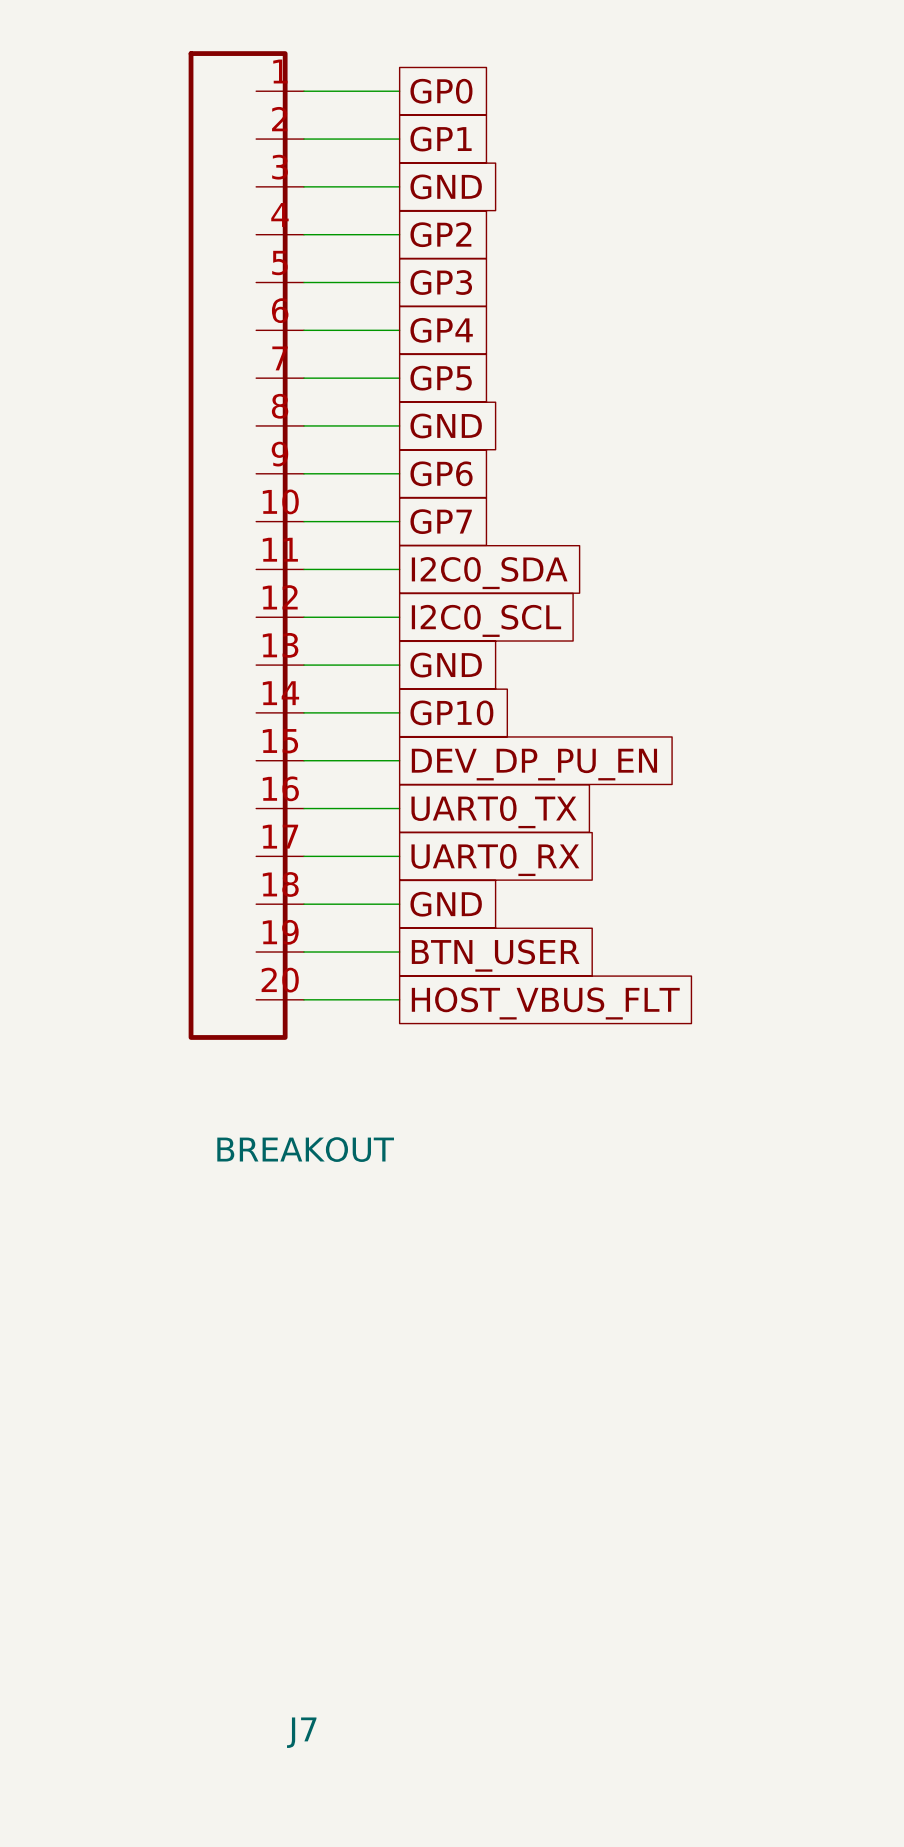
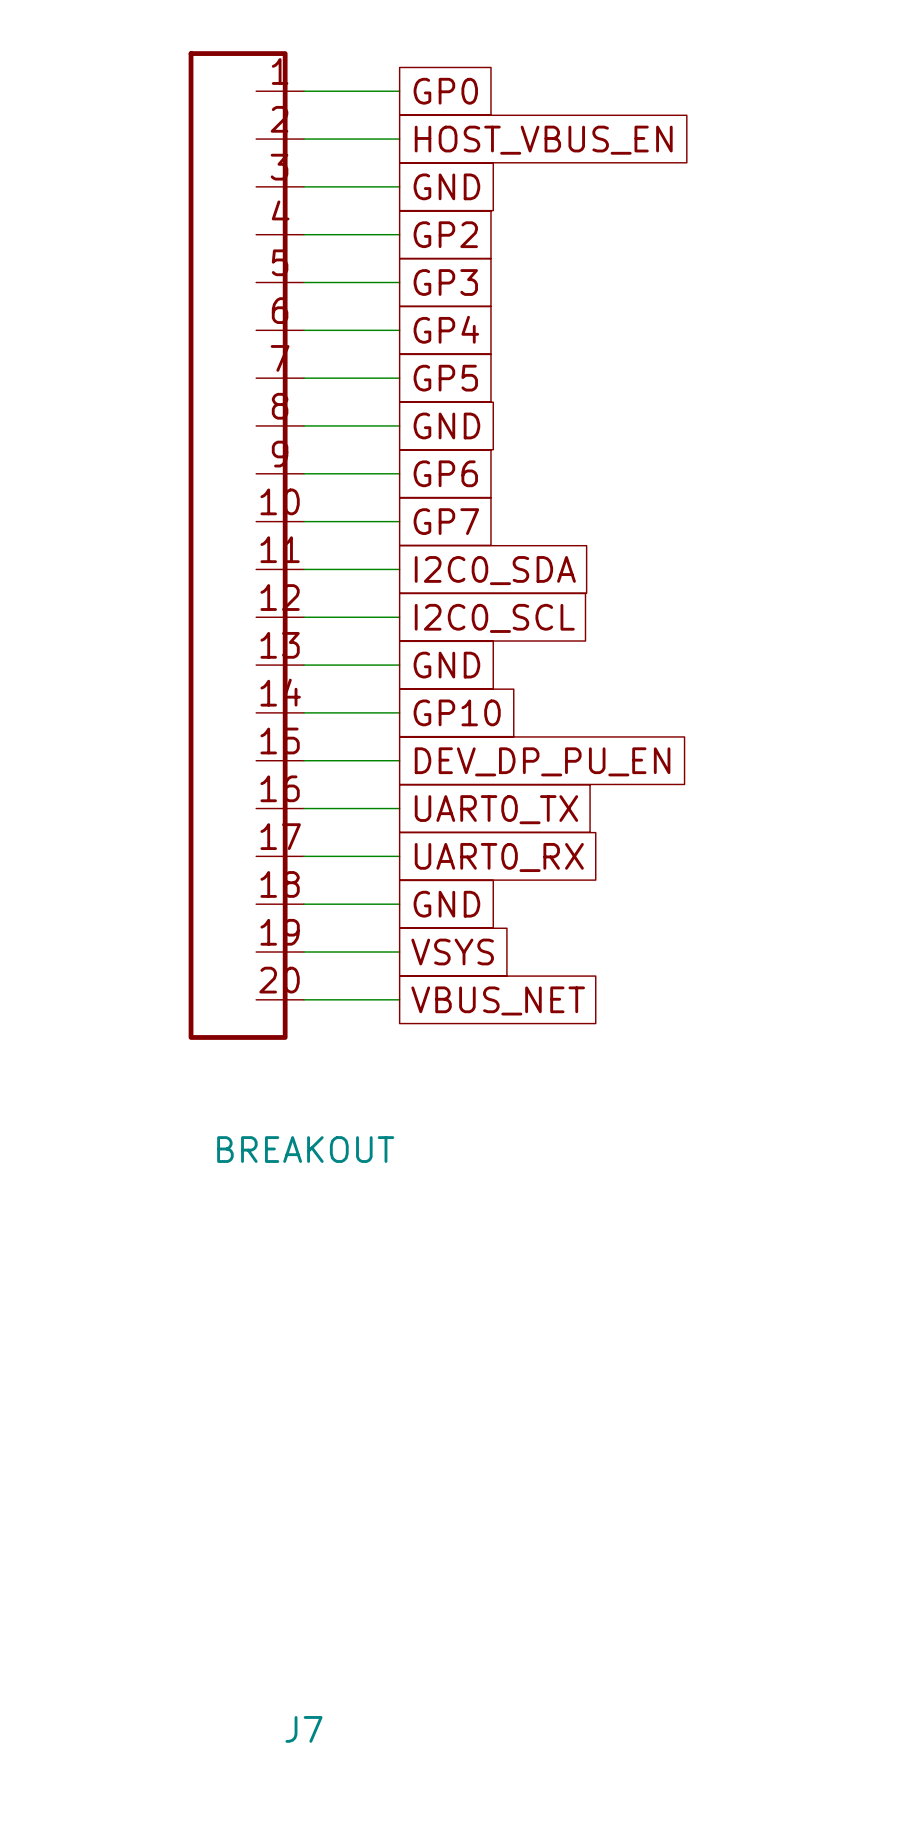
global label: GP1 (441, 139) -> HOST_VBUS_EN (543, 140)
global label: BTN_USER (495, 955) -> VSYS (452, 952)
global label: HOST_VBUS_FLT (545, 1003) -> VBUS_NET (498, 1000)

